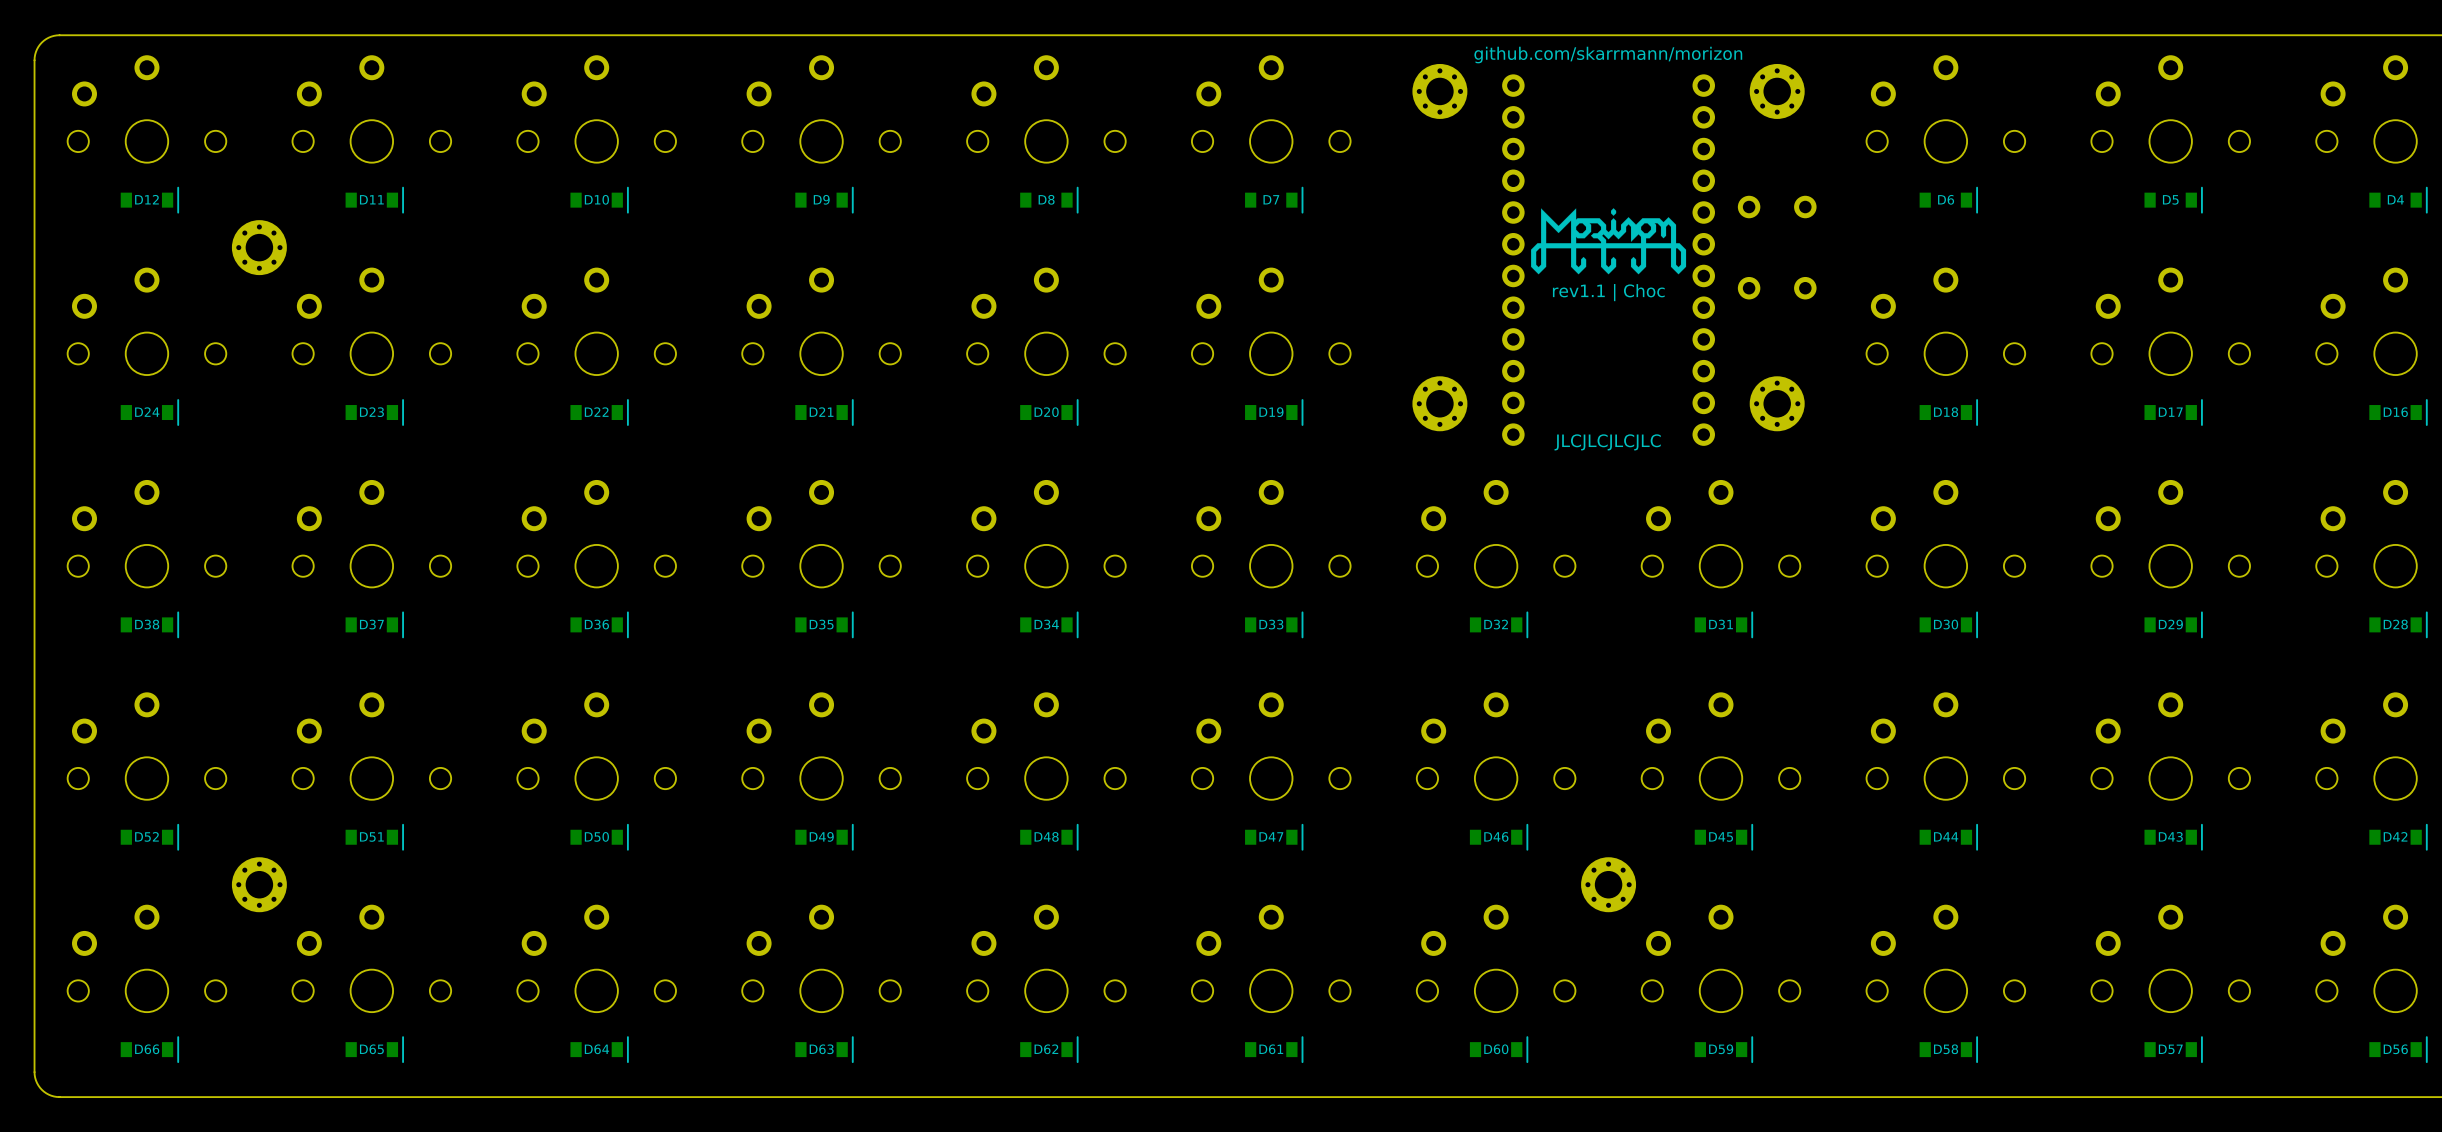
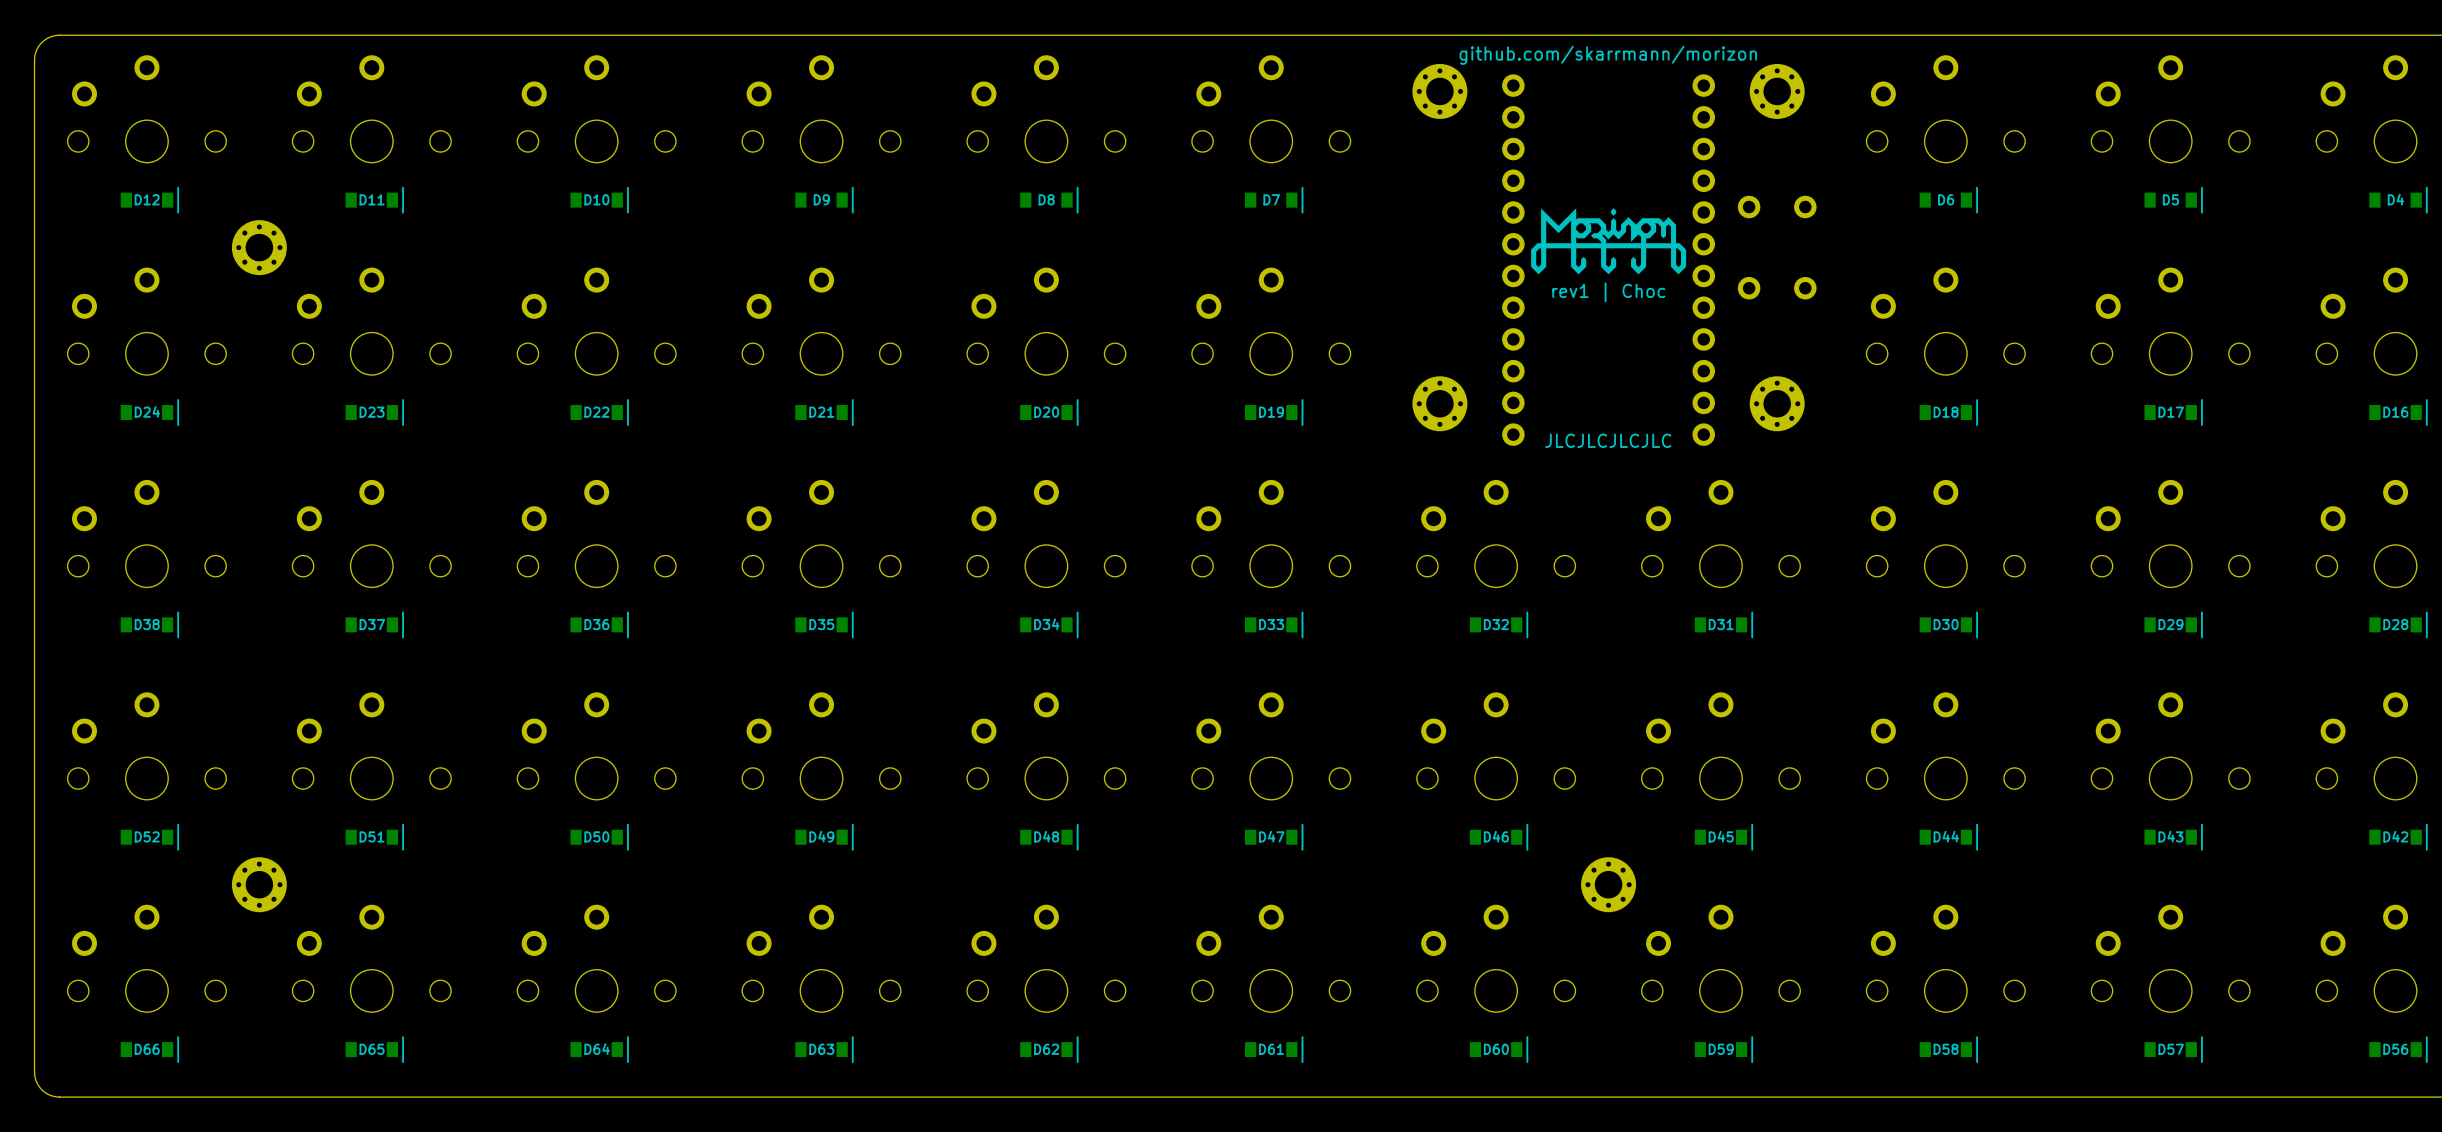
text: rev1.1 | Choc (1608, 292) -> rev1 | Choc (1608, 292)

